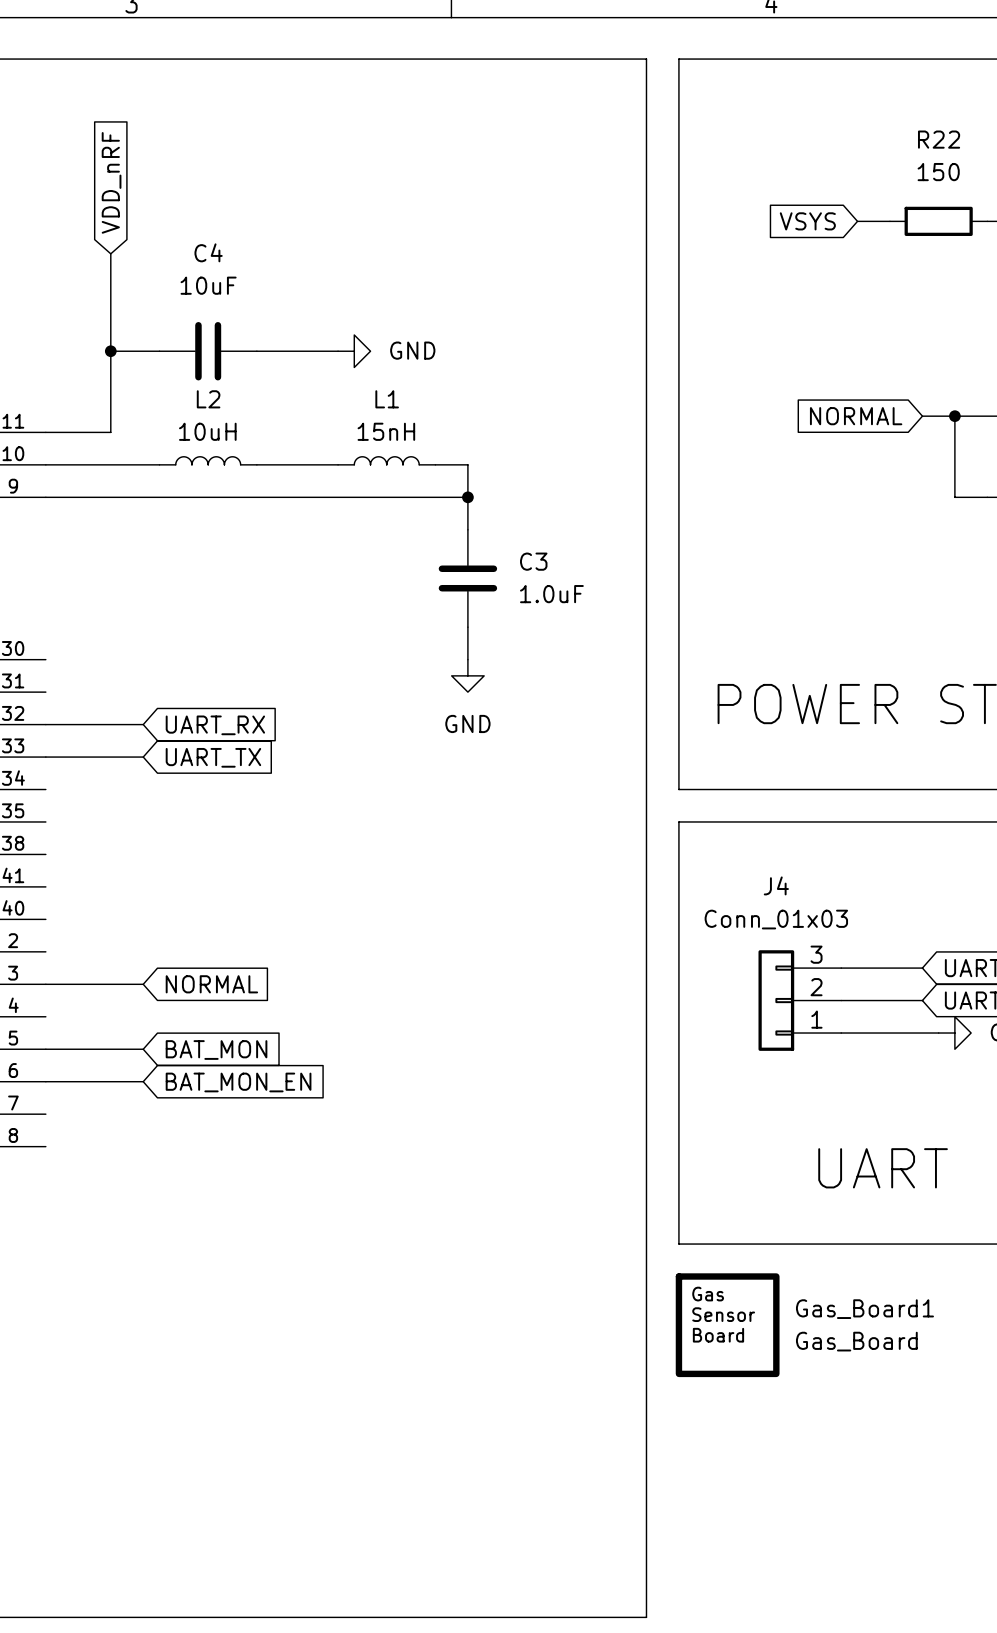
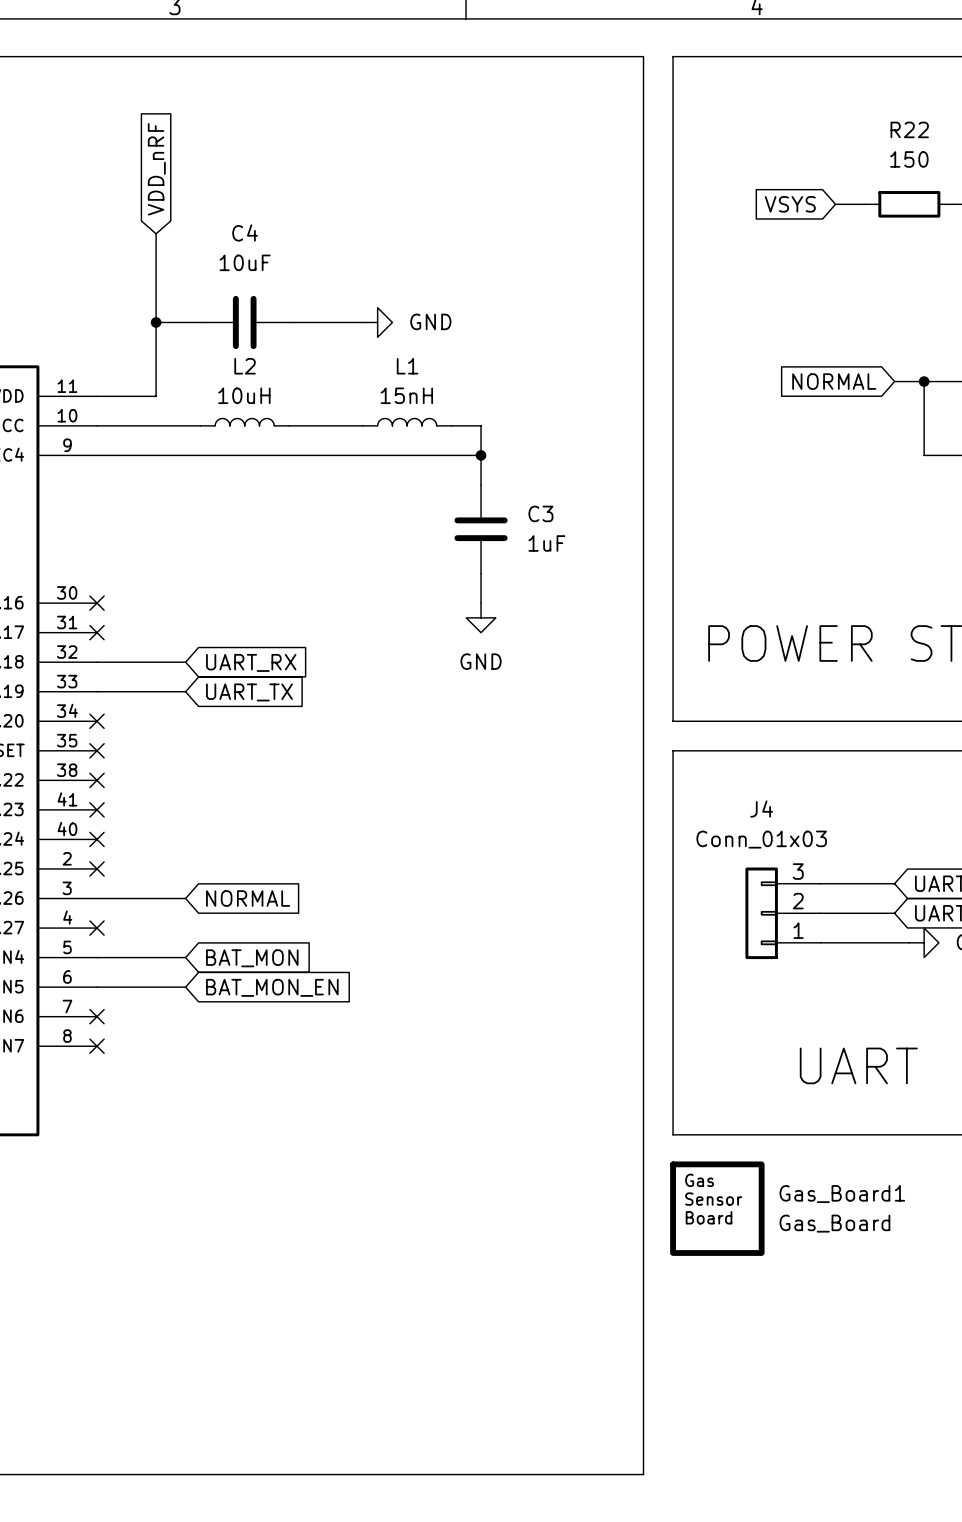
C3 value: 1.0uF (551, 594) -> 1uF (546, 543)
no-connect mark: none -> (97, 603)
no-connect mark: none -> (97, 632)
no-connect mark: none -> (97, 721)
no-connect mark: none -> (97, 750)
no-connect mark: none -> (97, 780)
no-connect mark: none -> (97, 809)
no-connect mark: none -> (97, 839)
no-connect mark: none -> (97, 868)
no-connect mark: none -> (97, 928)
no-connect mark: none -> (97, 1016)
no-connect mark: none -> (97, 1046)

